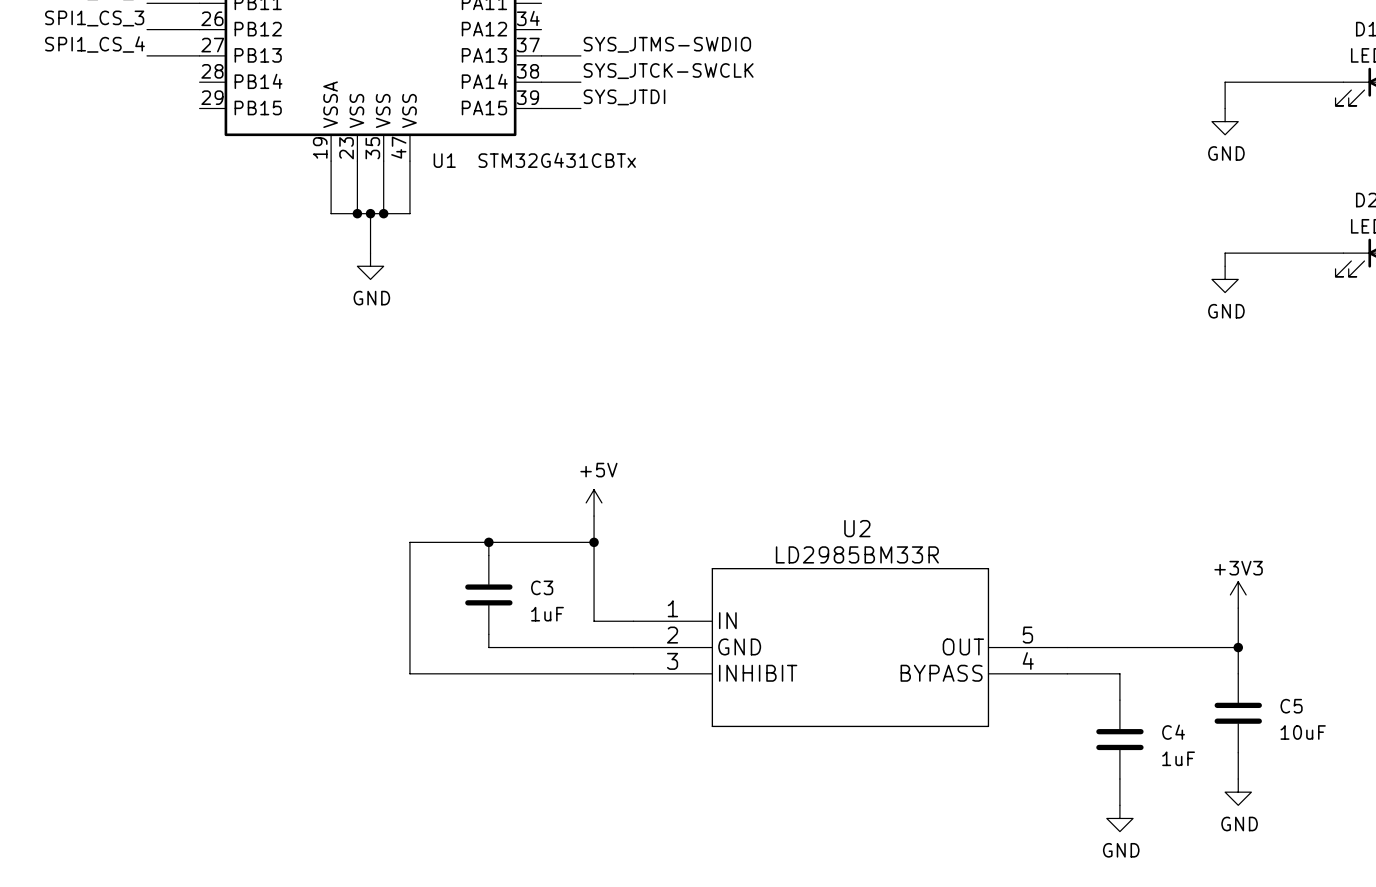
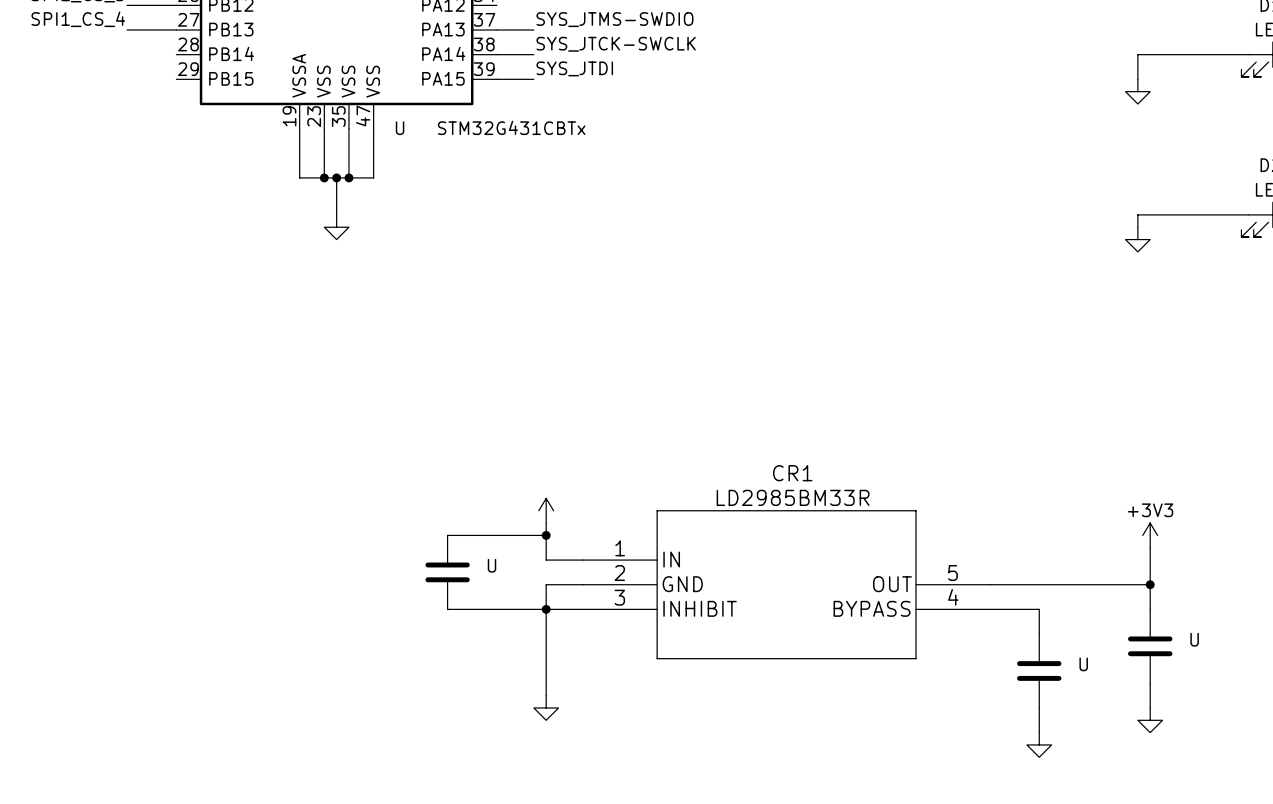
power symbol text: GND (1226, 153) -> none
U1 name: U1 (444, 160) -> U (400, 128)
power symbol text: GND (371, 298) -> none
power symbol text: GND (1226, 311) -> none
power symbol: +5V (594, 502) -> none
wire: (594, 516) (594, 581) -> none
U2 name: U2 (857, 528) -> CR1 (792, 473)
wire: (488, 542) (488, 555) -> none
junction: (488, 542) -> none
wire: (594, 542) (409, 542) (409, 673) (488, 673) -> none
junction position: (594, 542) -> (546, 535)
power symbol: none -> (546, 510)
wire: none -> (447, 535) (546, 535)
C3: 1uF (488, 594) -> none
wire: (488, 634) (488, 647) (594, 647) -> (546, 695) (546, 584)
U: none -> (447, 572)
junction: none -> (546, 609)
C5 name: C5 (1291, 706) -> U (1194, 639)
C4 name: C4 (1173, 732) -> U (1083, 664)
C5 value: 10uF (1303, 732) -> none
C4 value: 1uF (1178, 758) -> none
power symbol: none -> (546, 707)
power symbol text: GND (1239, 824) -> none
power symbol text: GND (1121, 850) -> none

